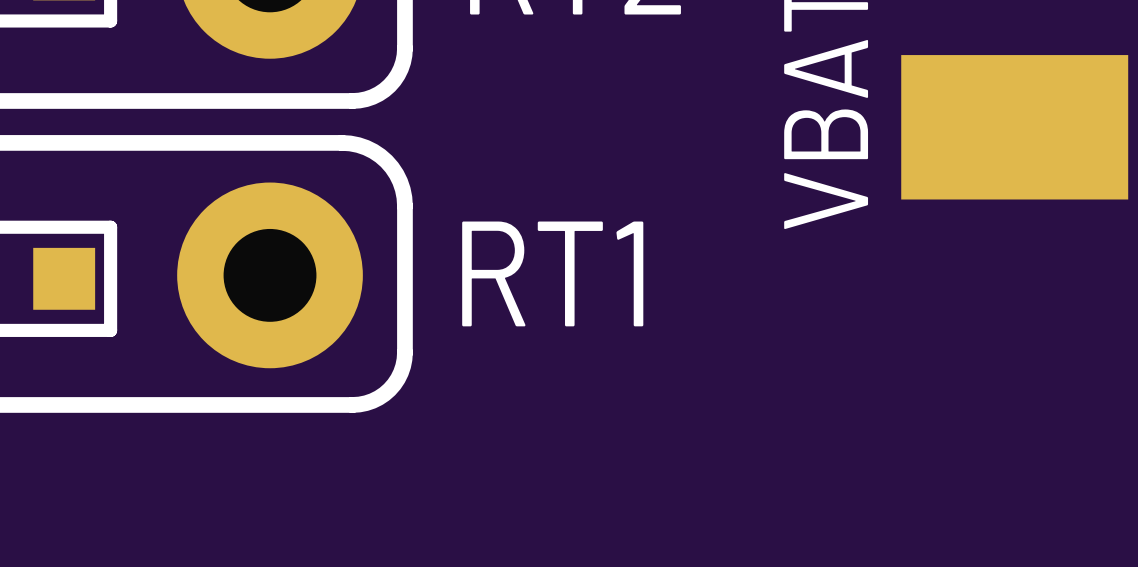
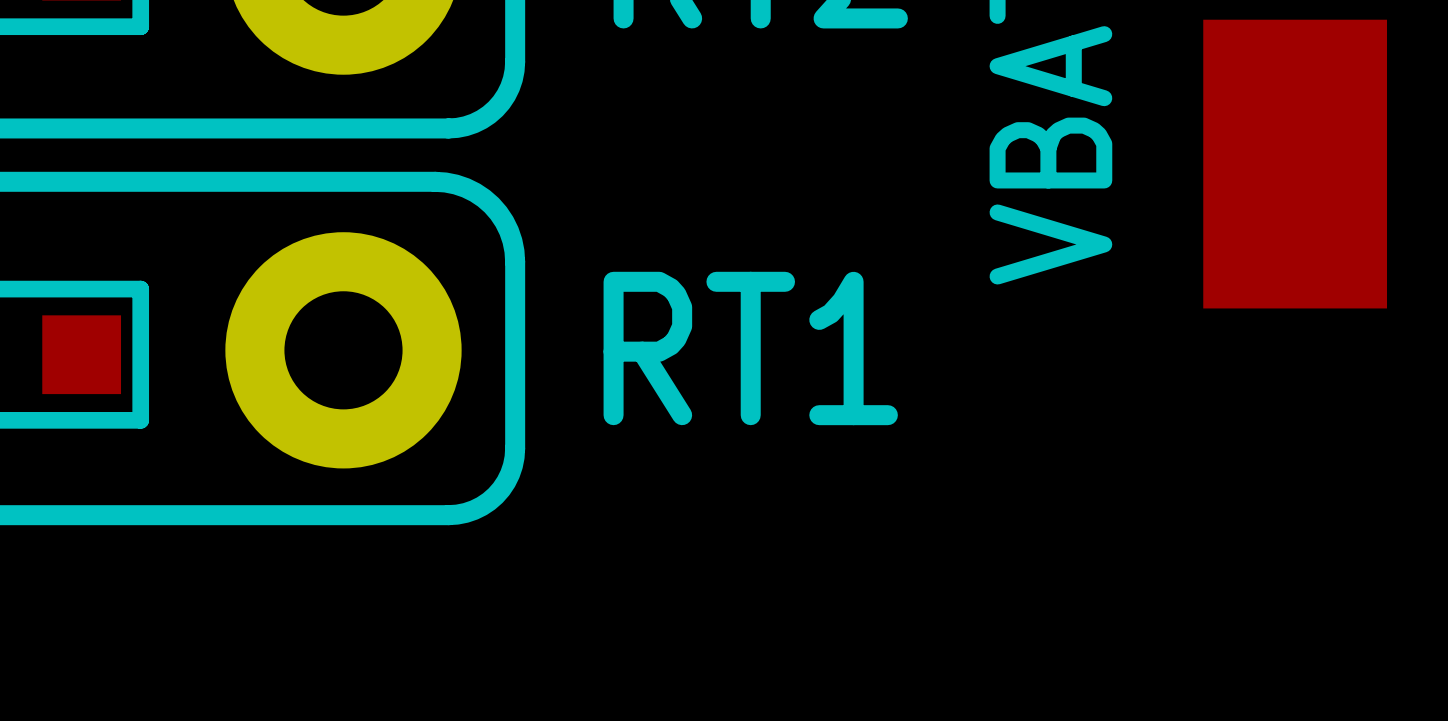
part rotation: 0° (1014, 127) -> 90° clockwise (1295, 164)

